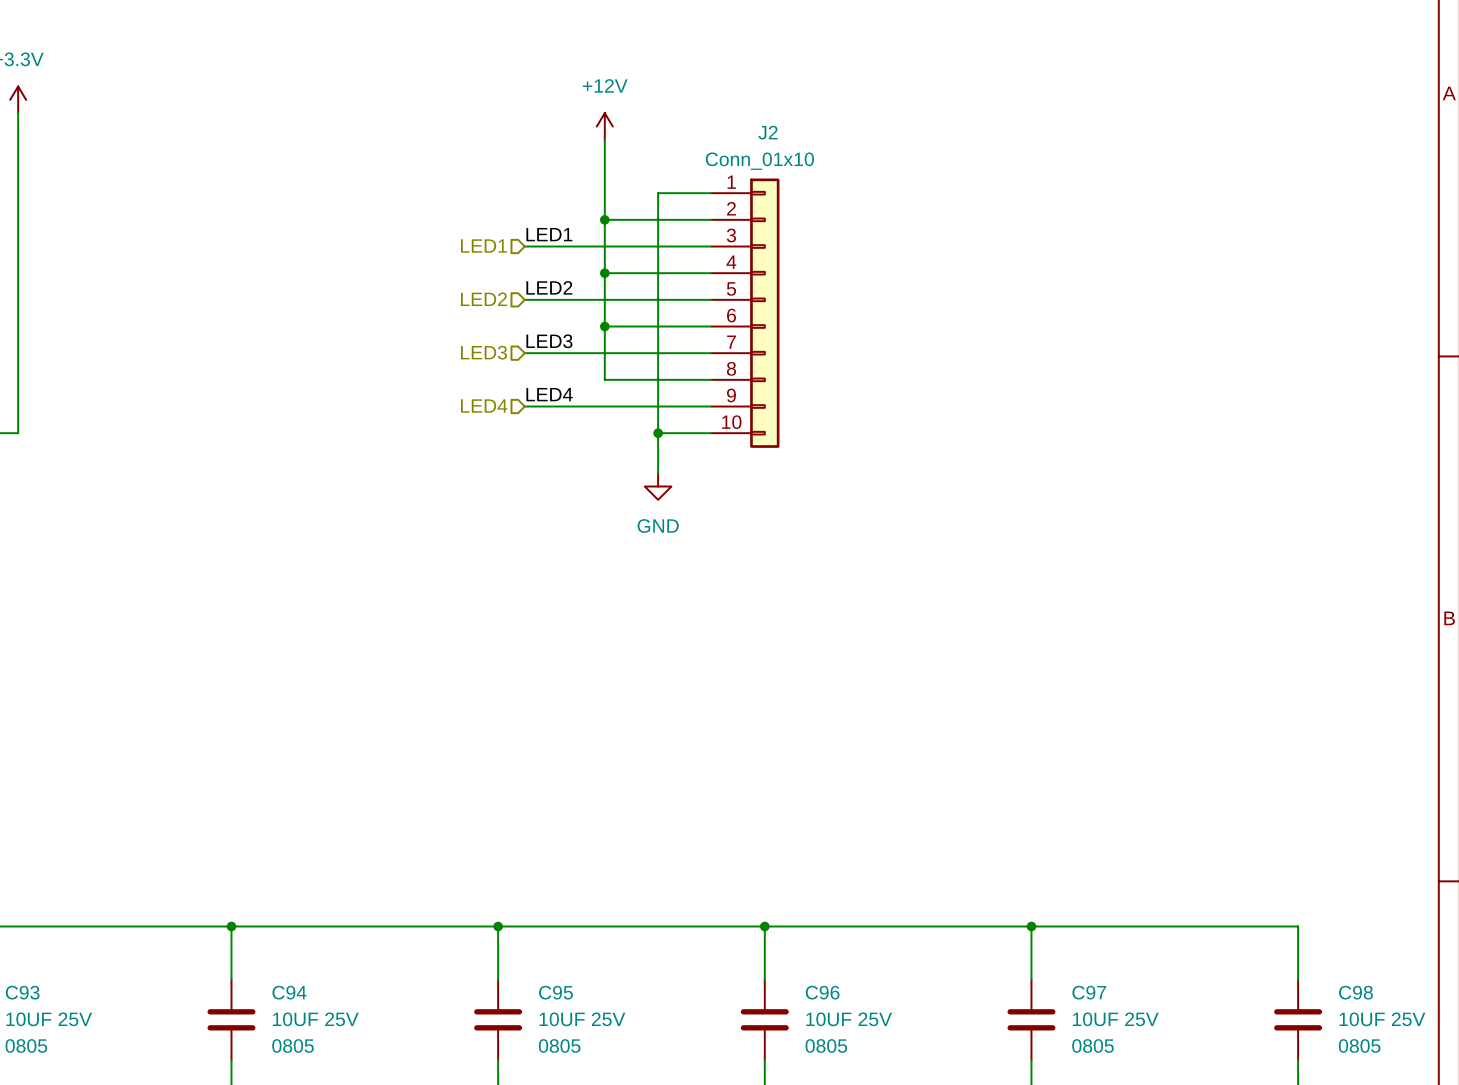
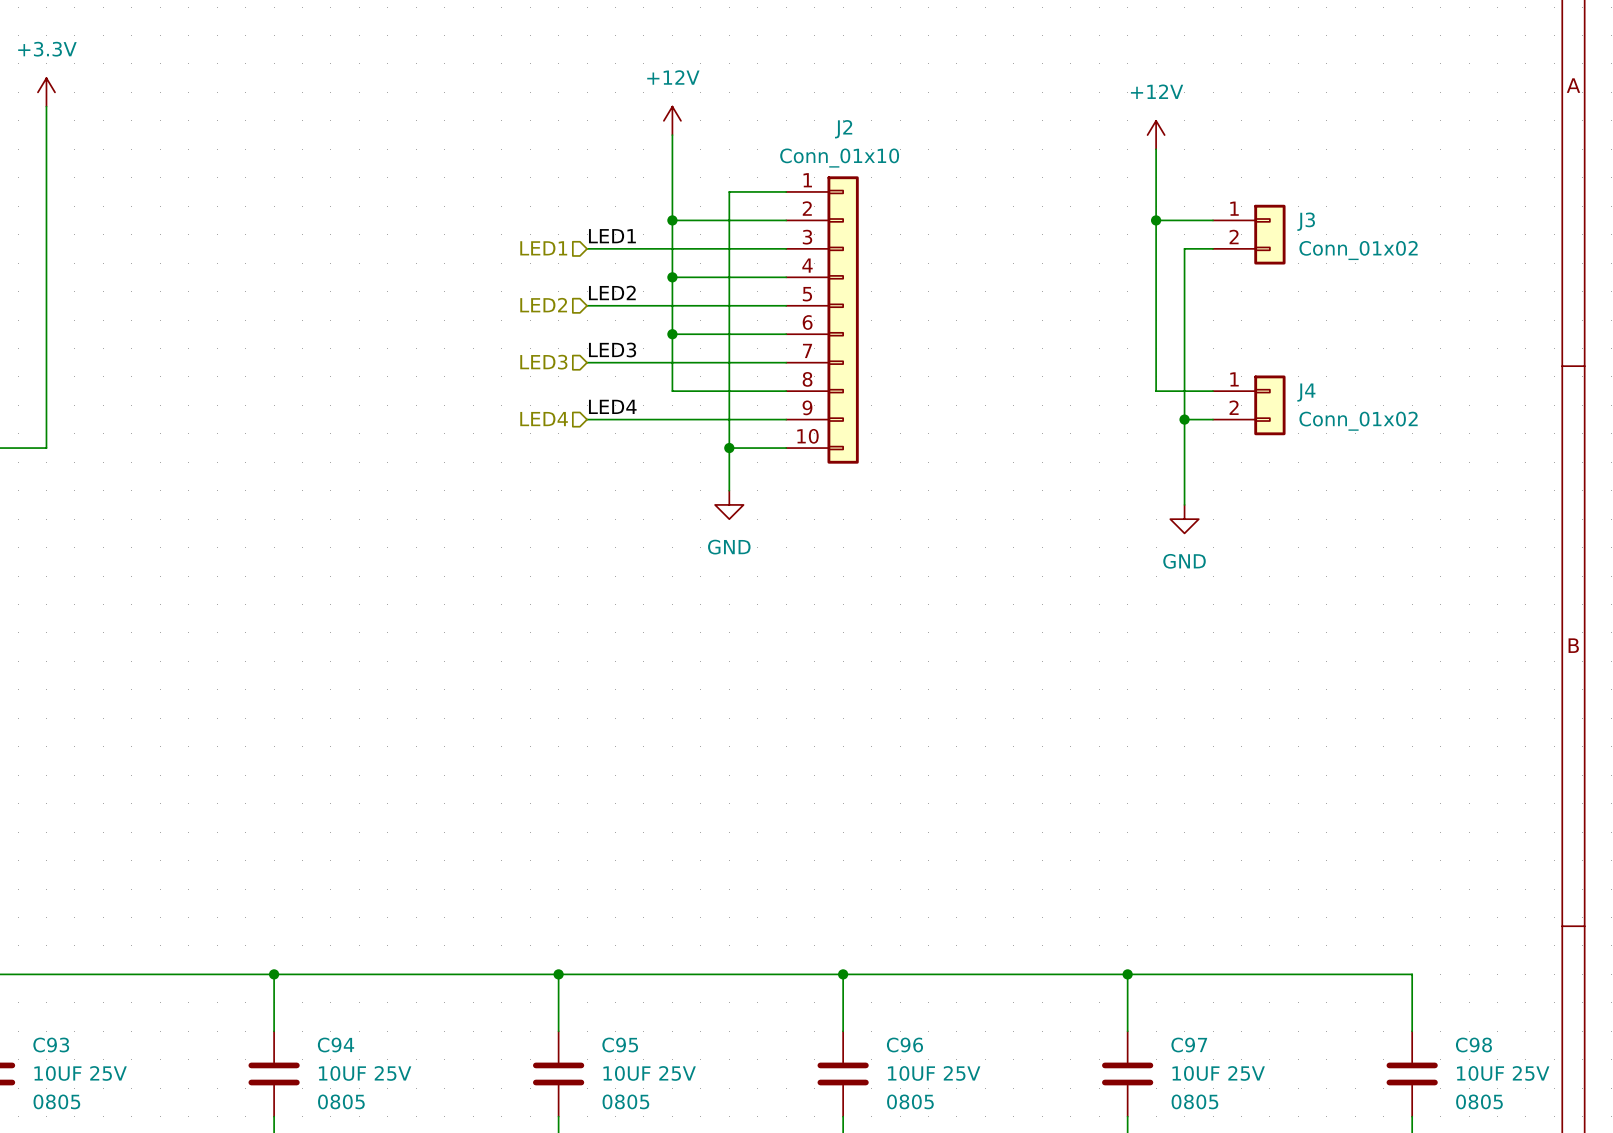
power symbol: none -> +12V (1156, 135)
wire: none -> (1156, 149) (1156, 391) (1213, 391)
wire: none -> (1156, 220) (1213, 220)
junction: none -> (1156, 220)
J3: none -> Conn_01x02 (1249, 234)
wire: none -> (1213, 248) (1184, 248) (1184, 504)
J4: none -> Conn_01x02 (1249, 405)
wire: none -> (1184, 419) (1213, 419)
junction: none -> (1184, 419)
power symbol: none -> GND (1184, 519)

